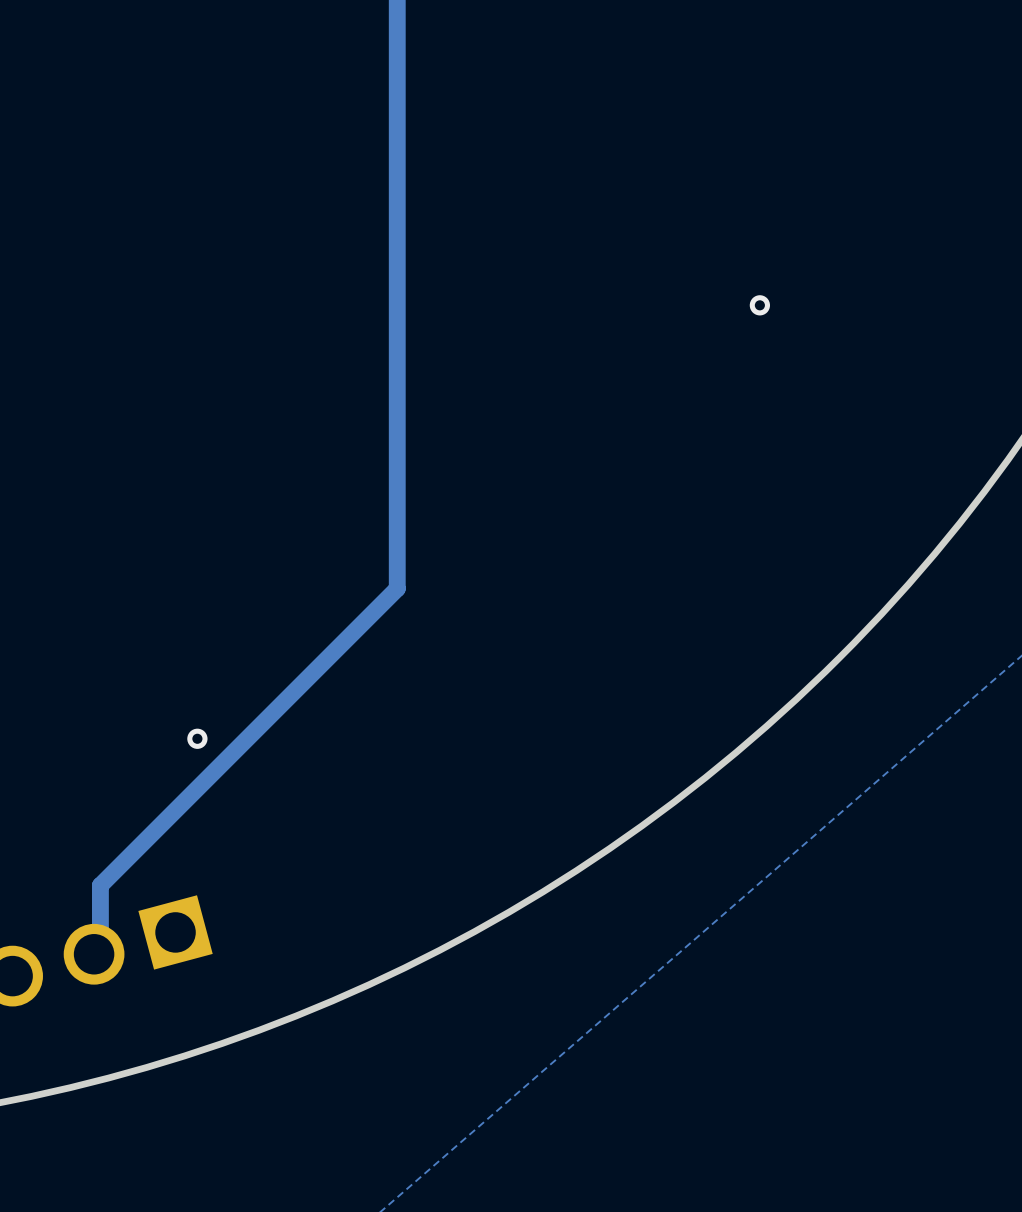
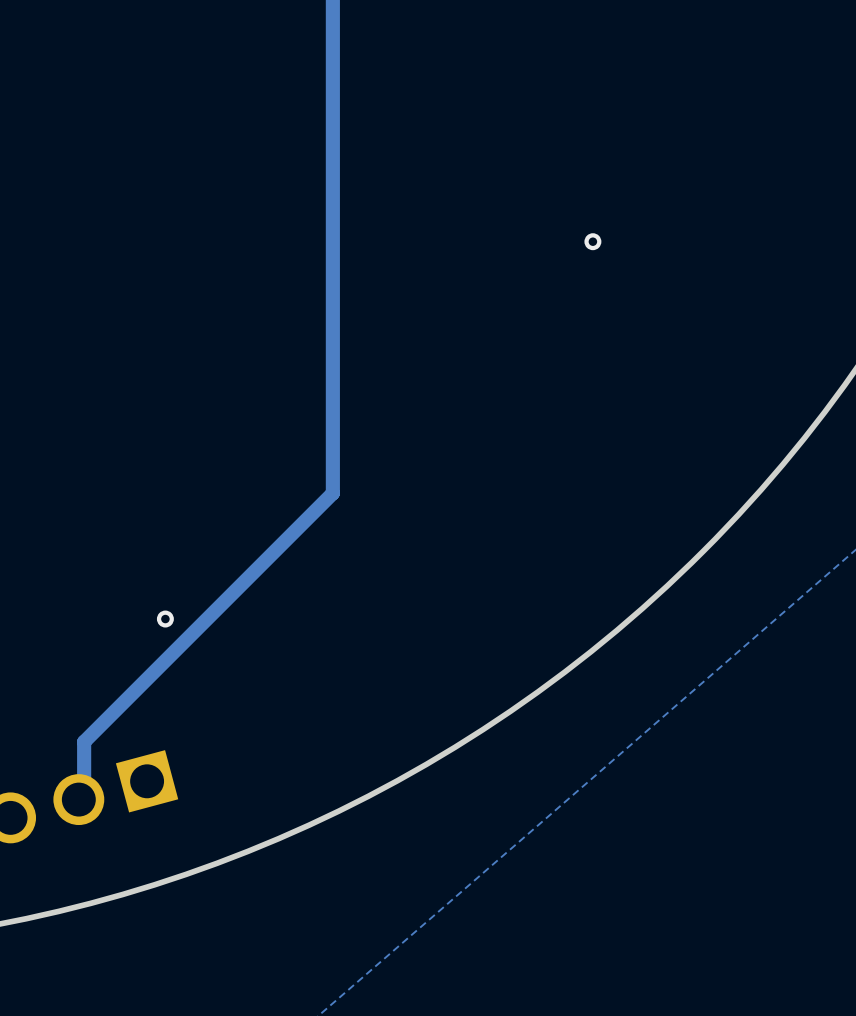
via position: (759, 305) -> (592, 241)

